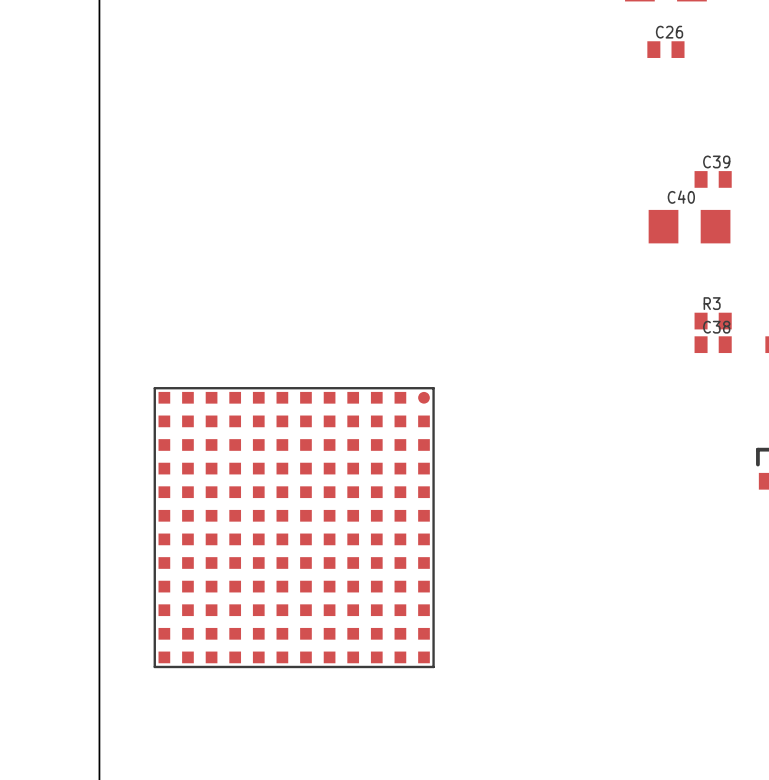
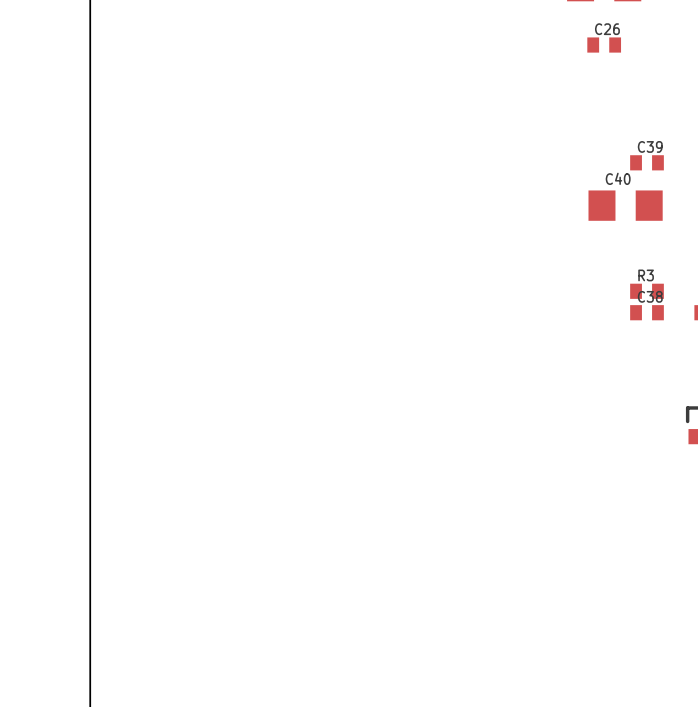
part: (294, 527) -> none

